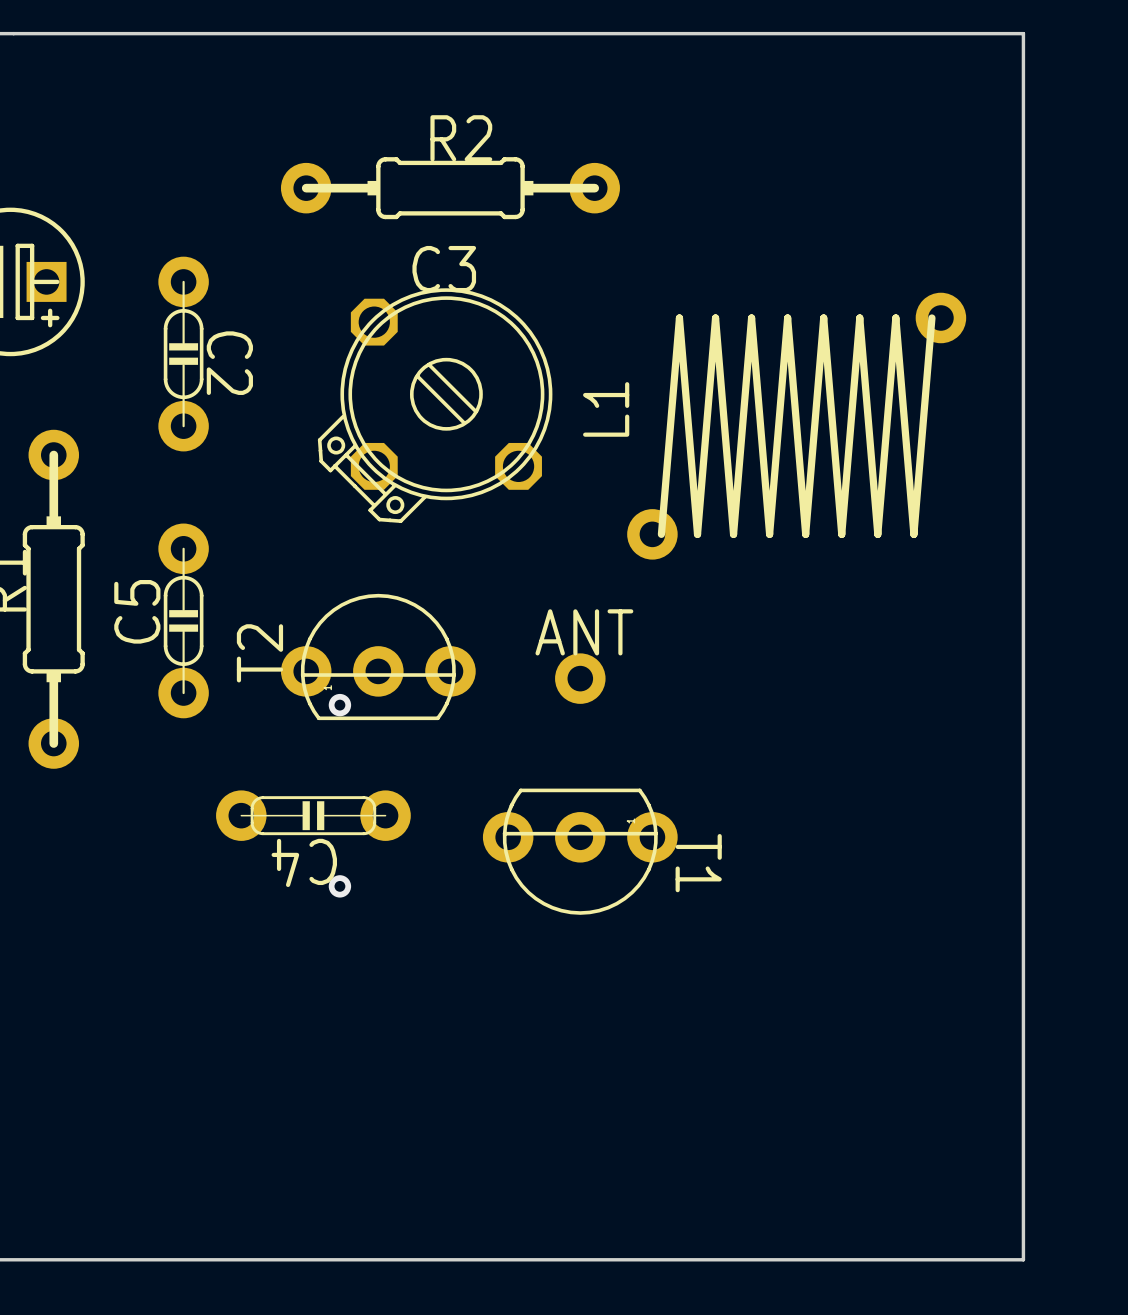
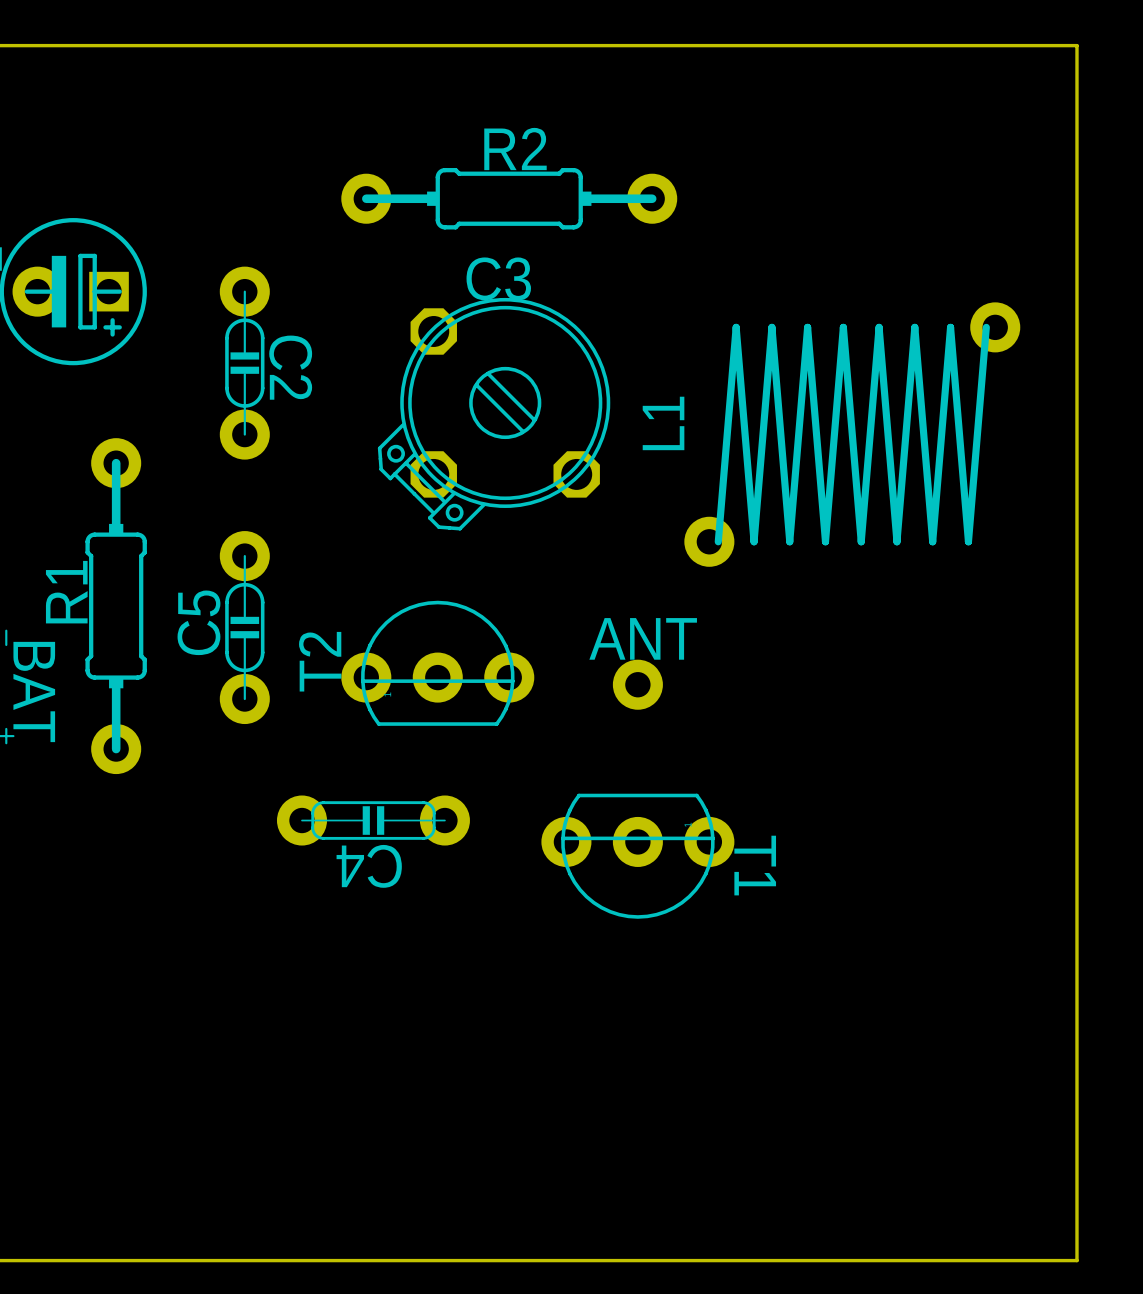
via: (339, 705) -> none
via: (339, 886) -> none

